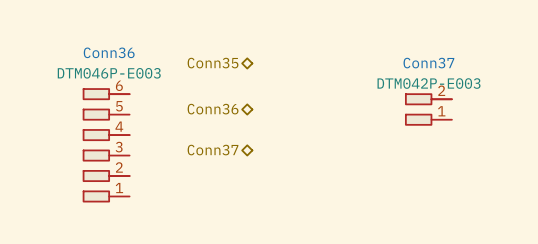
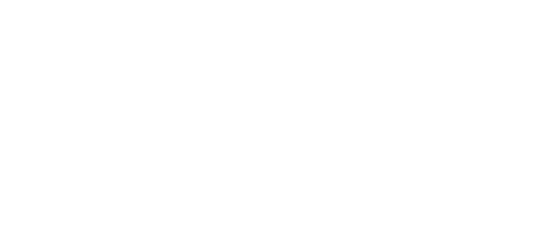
hierarchical label: Conn35 (213, 63) -> none
hierarchical label: Conn36 (213, 109) -> none
Conn37: (428, 109) -> none
Conn36: (106, 145) -> none
hierarchical label: Conn37 (213, 150) -> none

